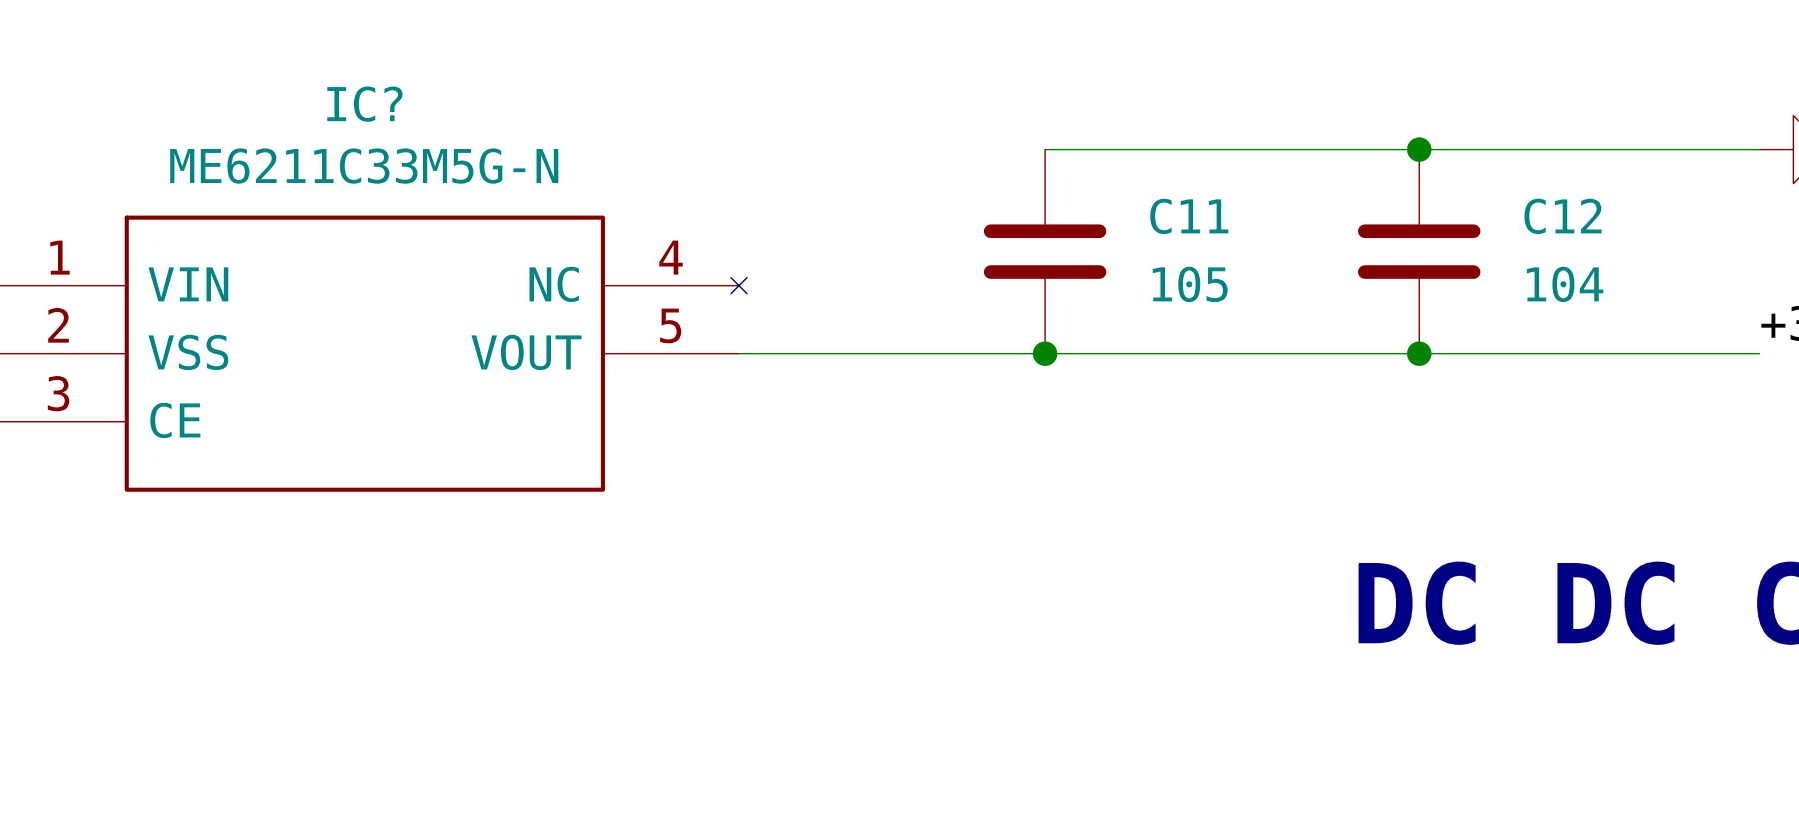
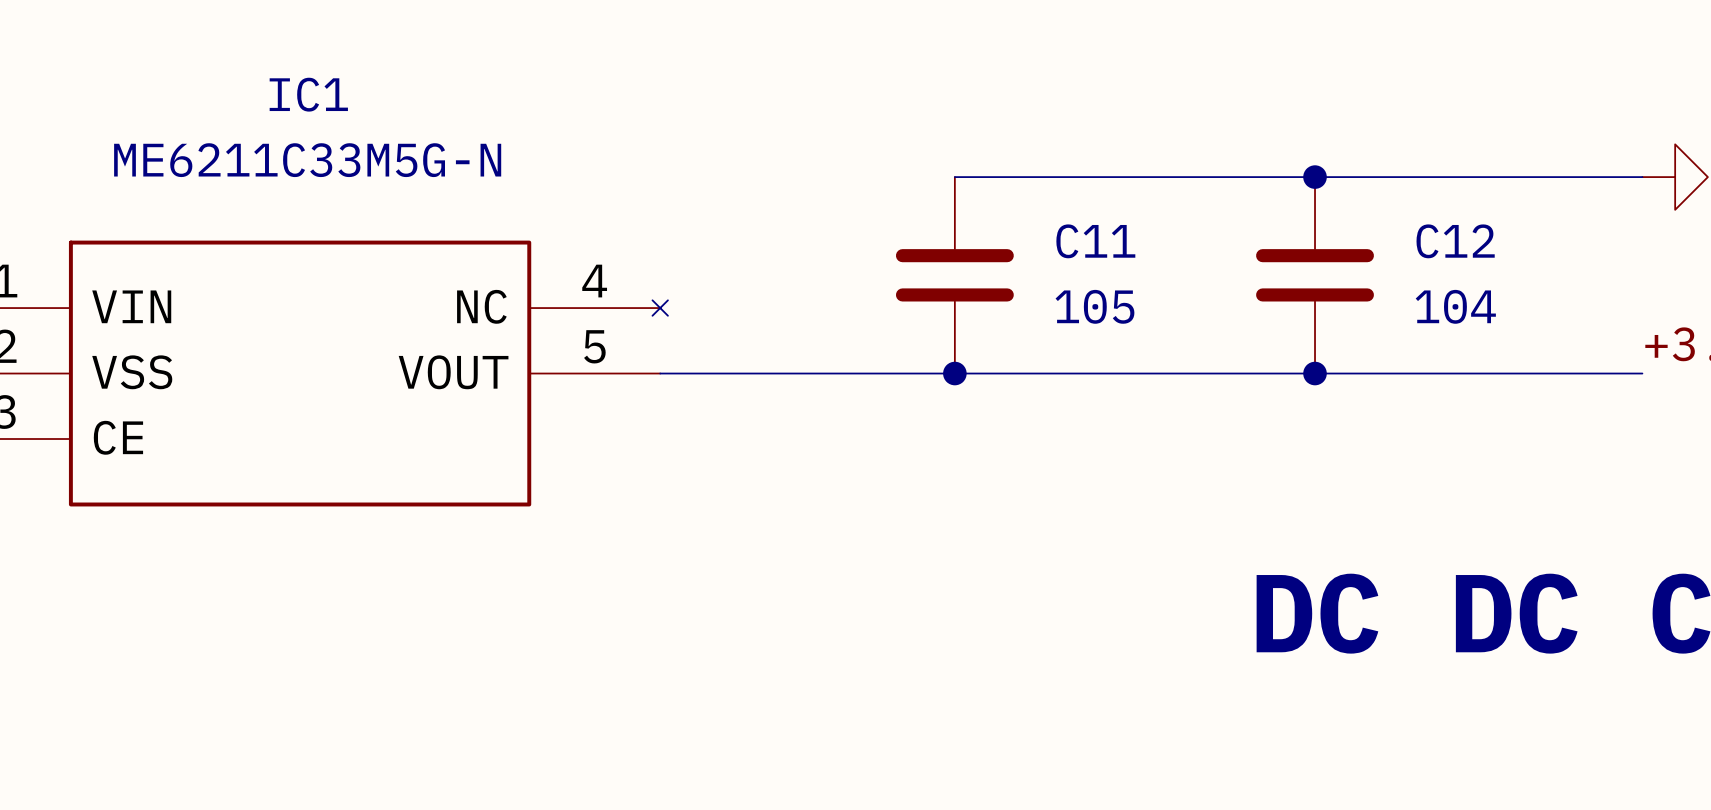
IC? name: IC? (364, 104) -> IC1 (308, 94)
IC? value position: ME6211C33M5G-N (364, 166) -> ME6211C33M5G-N (307, 160)

